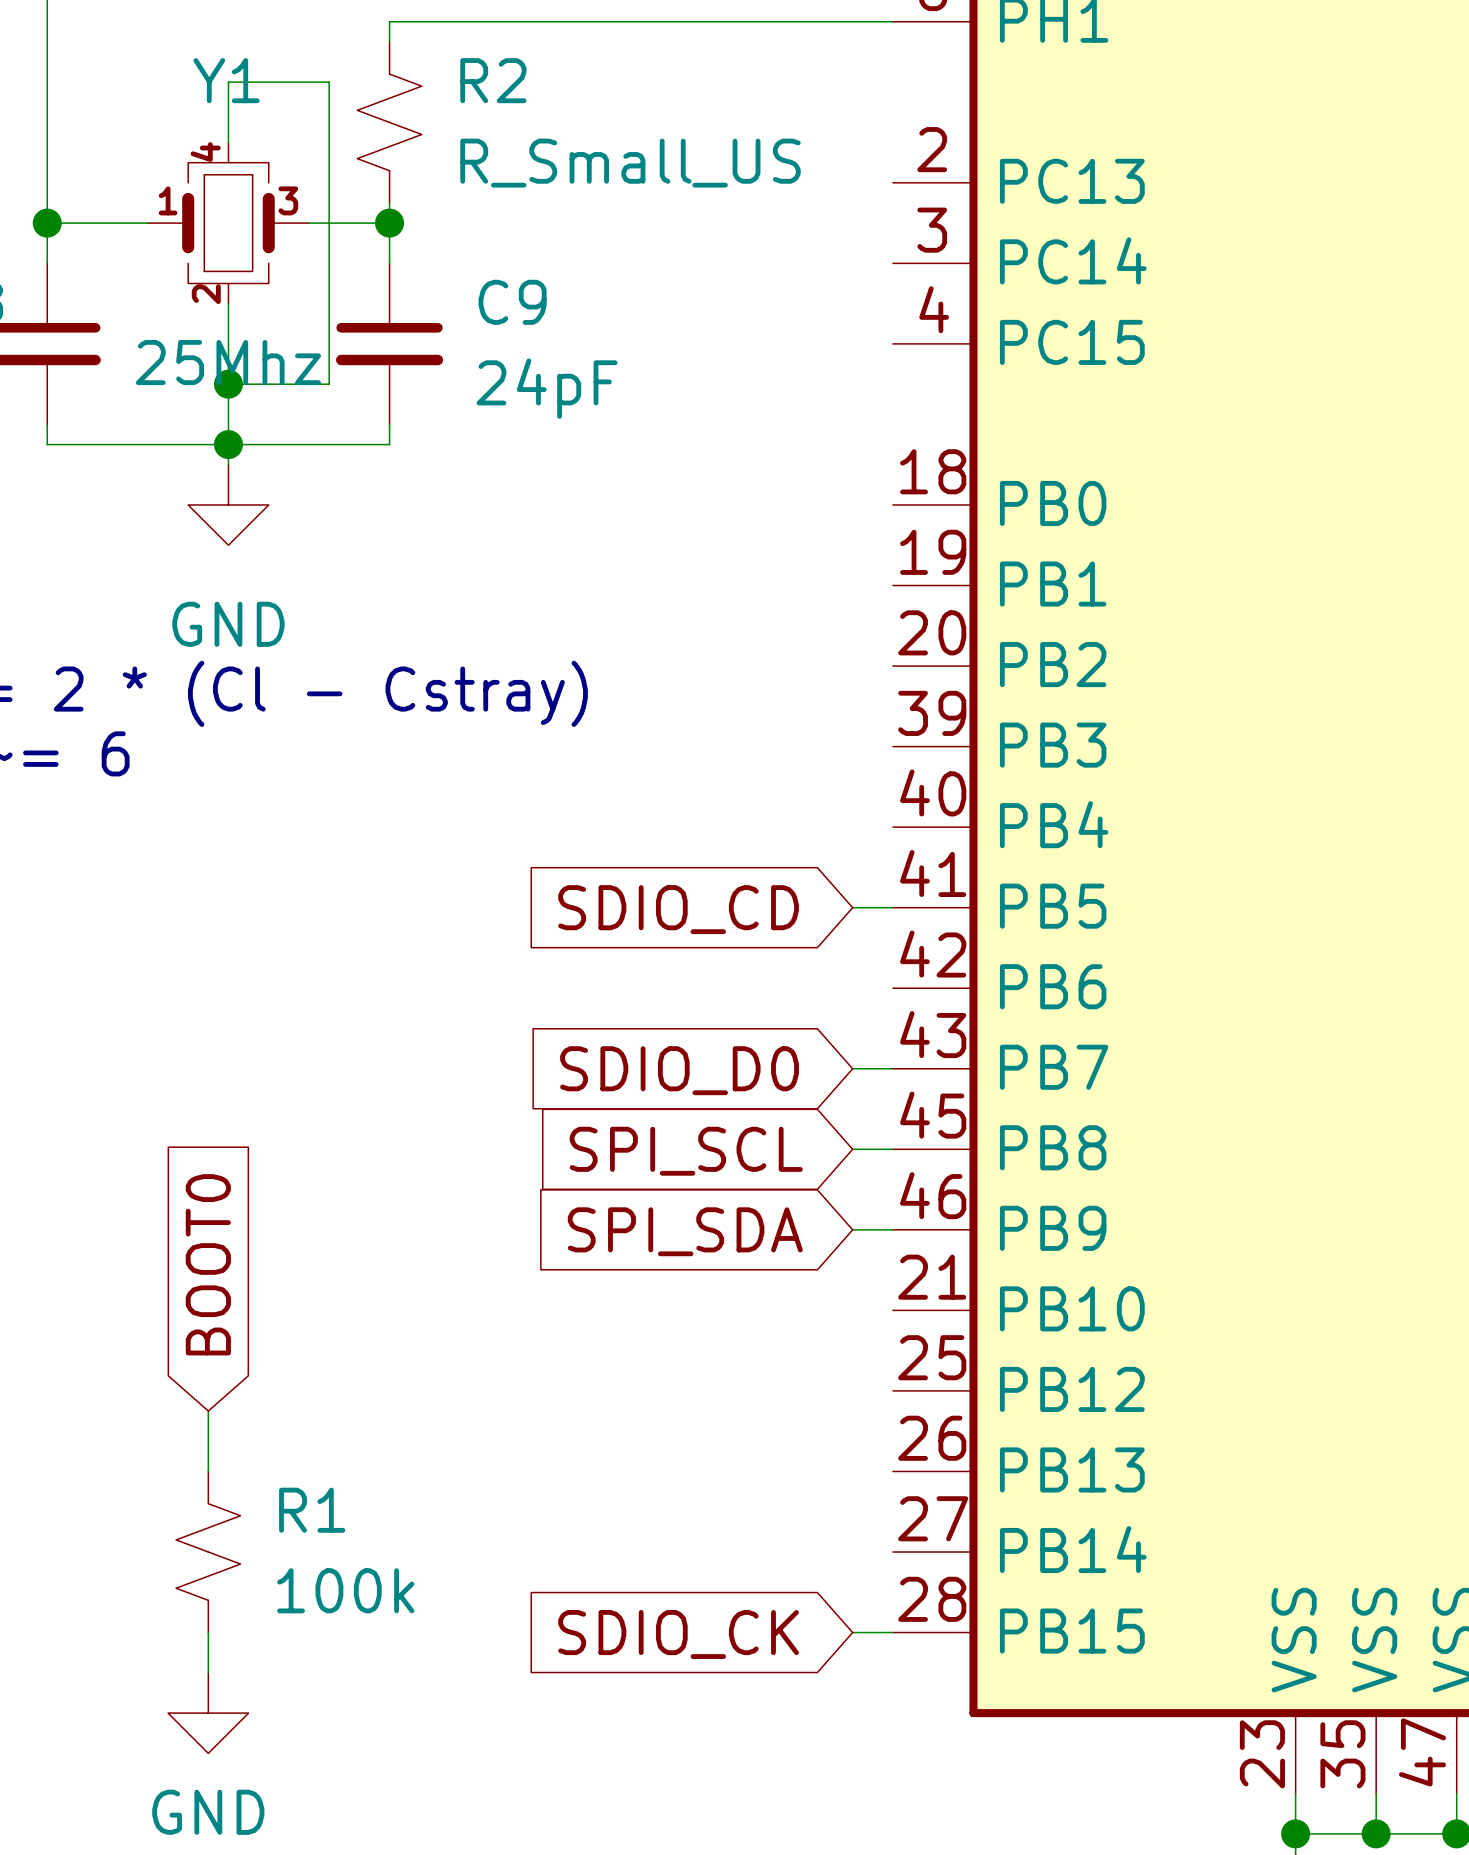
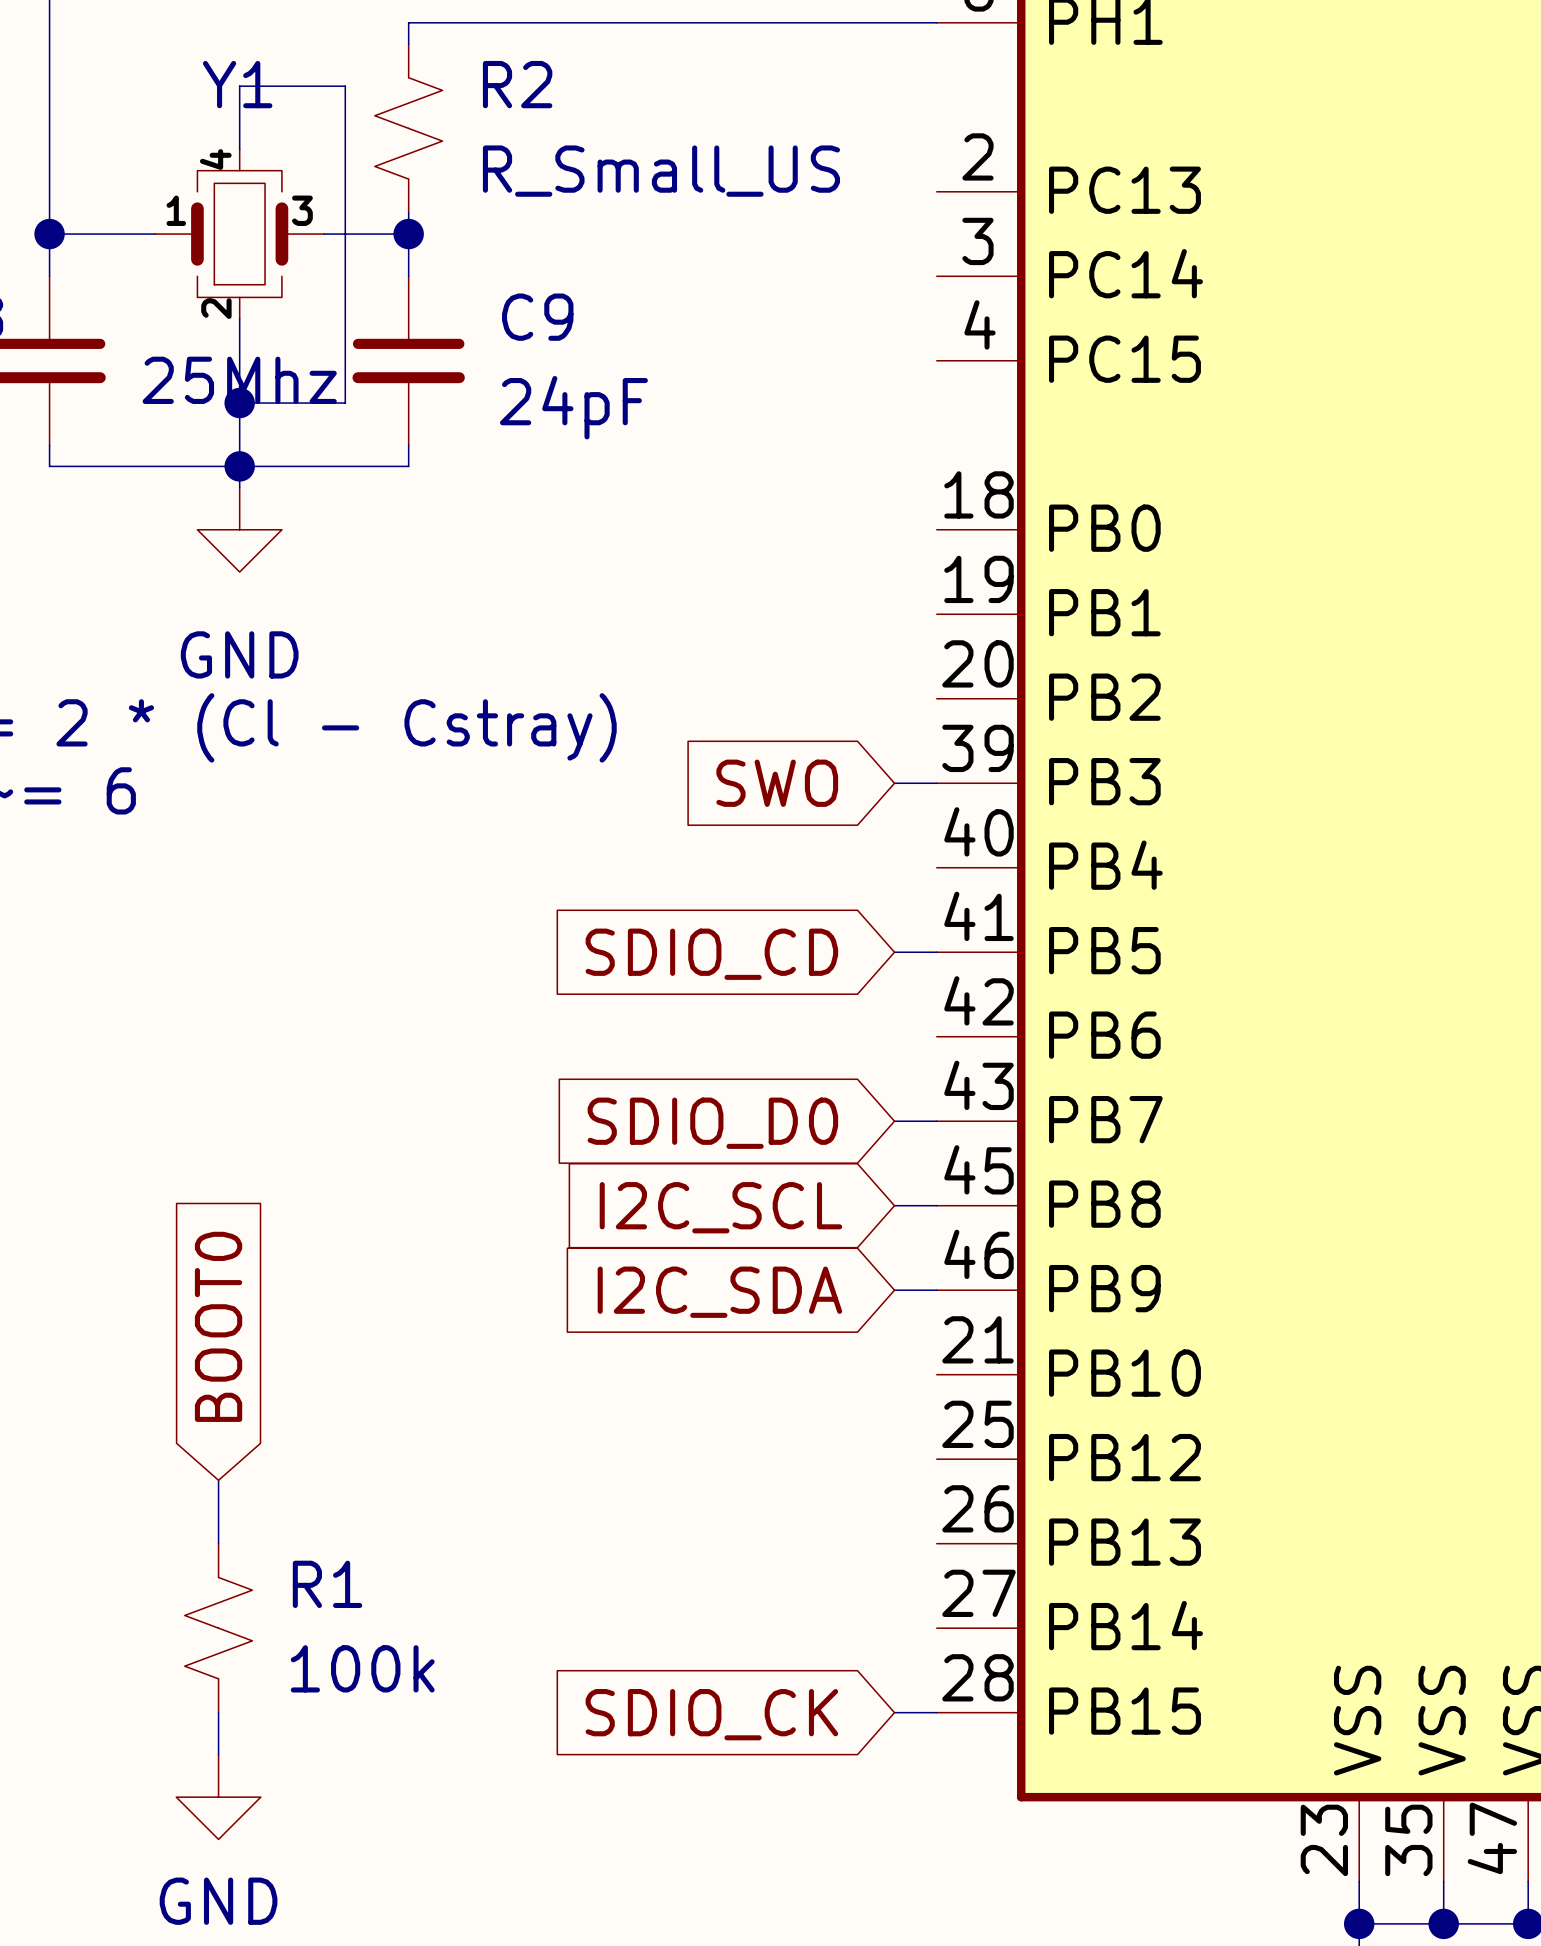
global label: none -> SWO (777, 783)
wire: none -> (894, 783) (936, 783)
global label: SPI_SCL (686, 1151) -> I2C_SCL (720, 1207)
global label: SPI_SDA (685, 1231) -> I2C_SDA (719, 1292)

